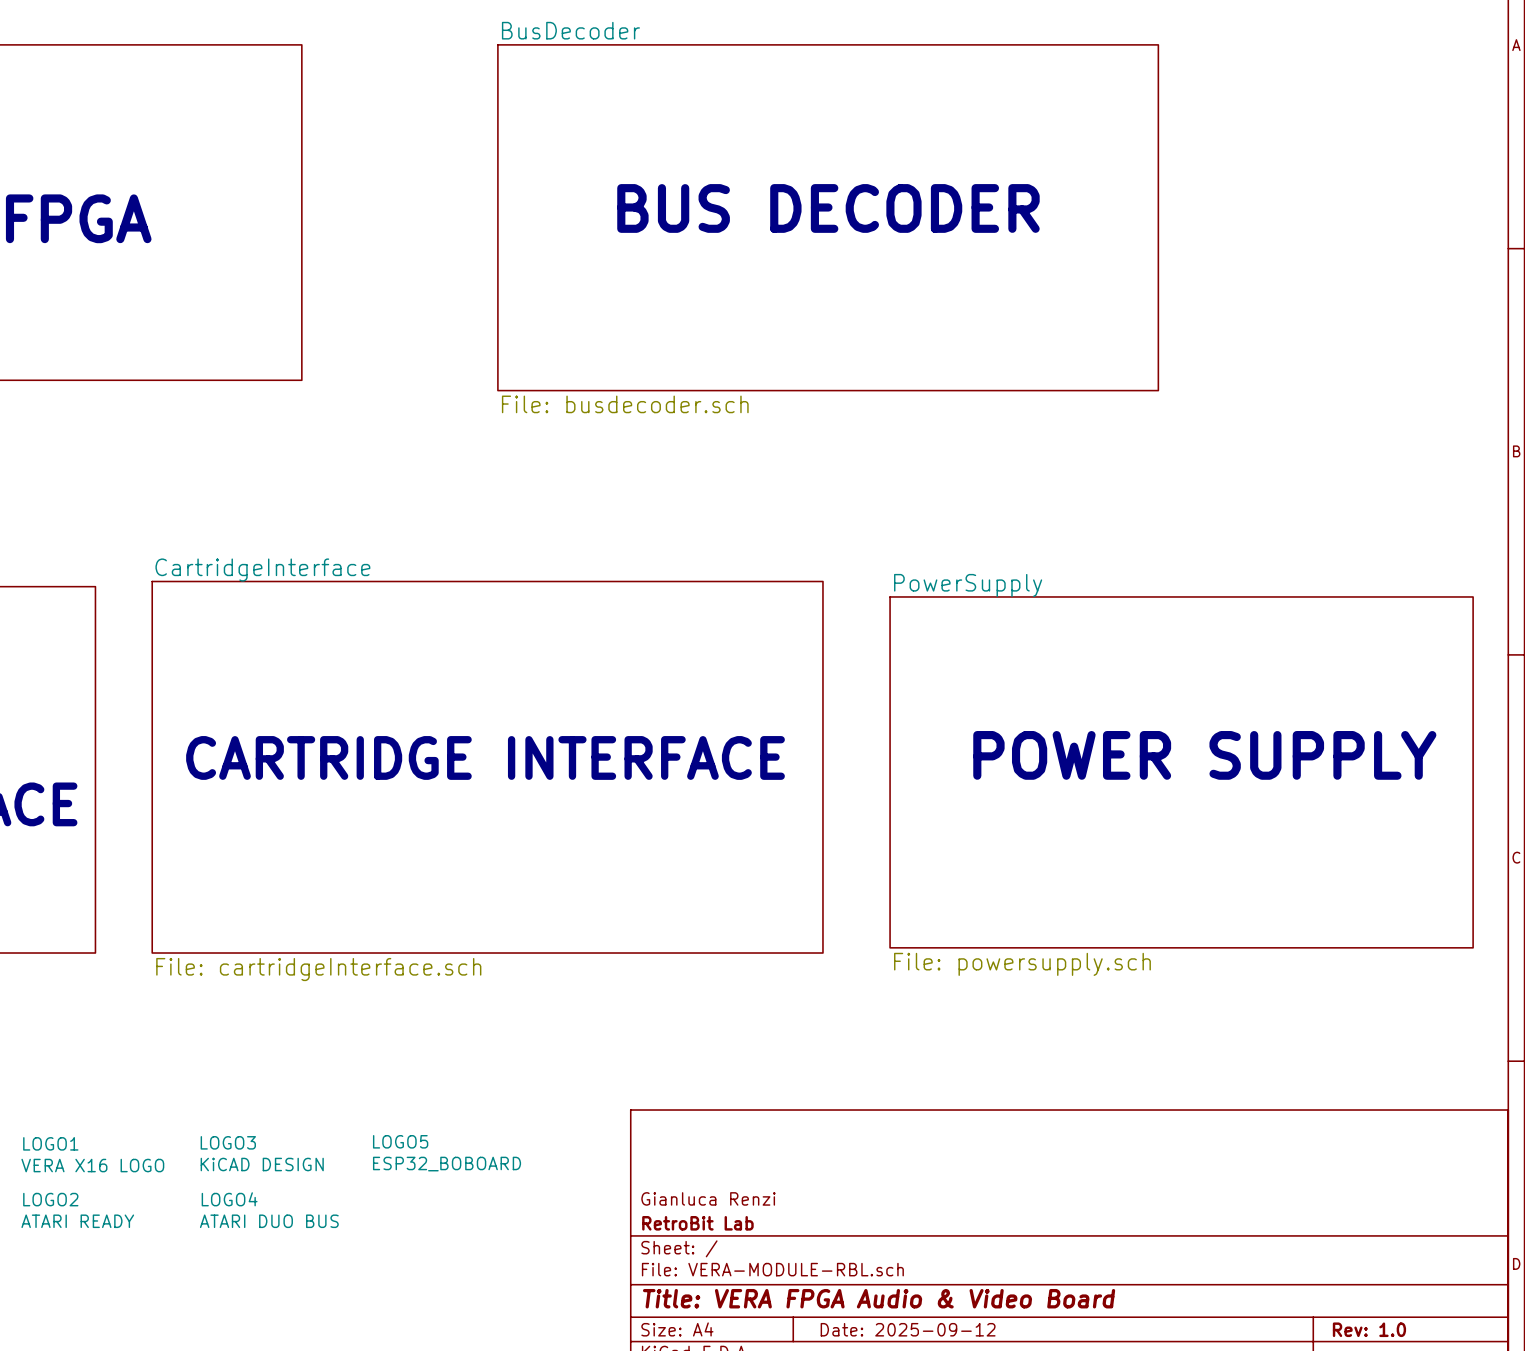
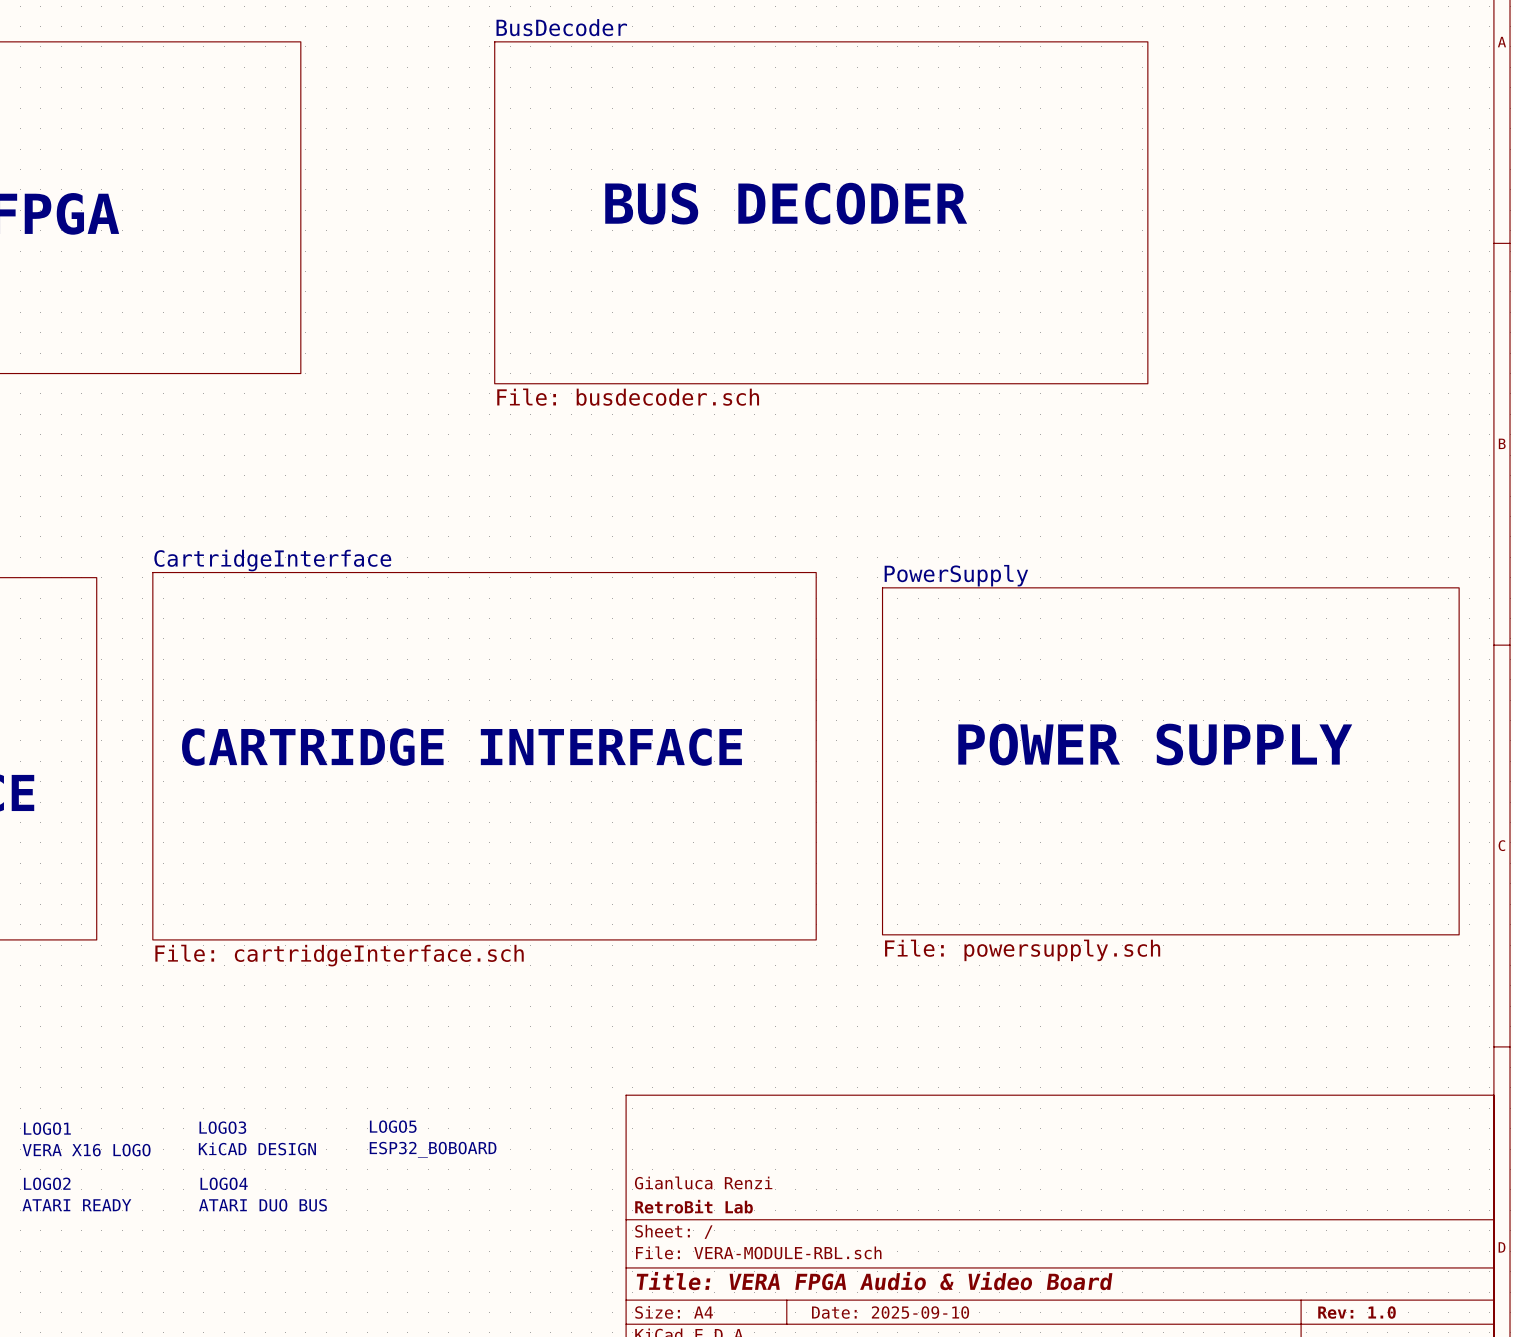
title block: Date: 2025-09-12 (908, 1329) -> Date: 2025-09-10 (890, 1312)

